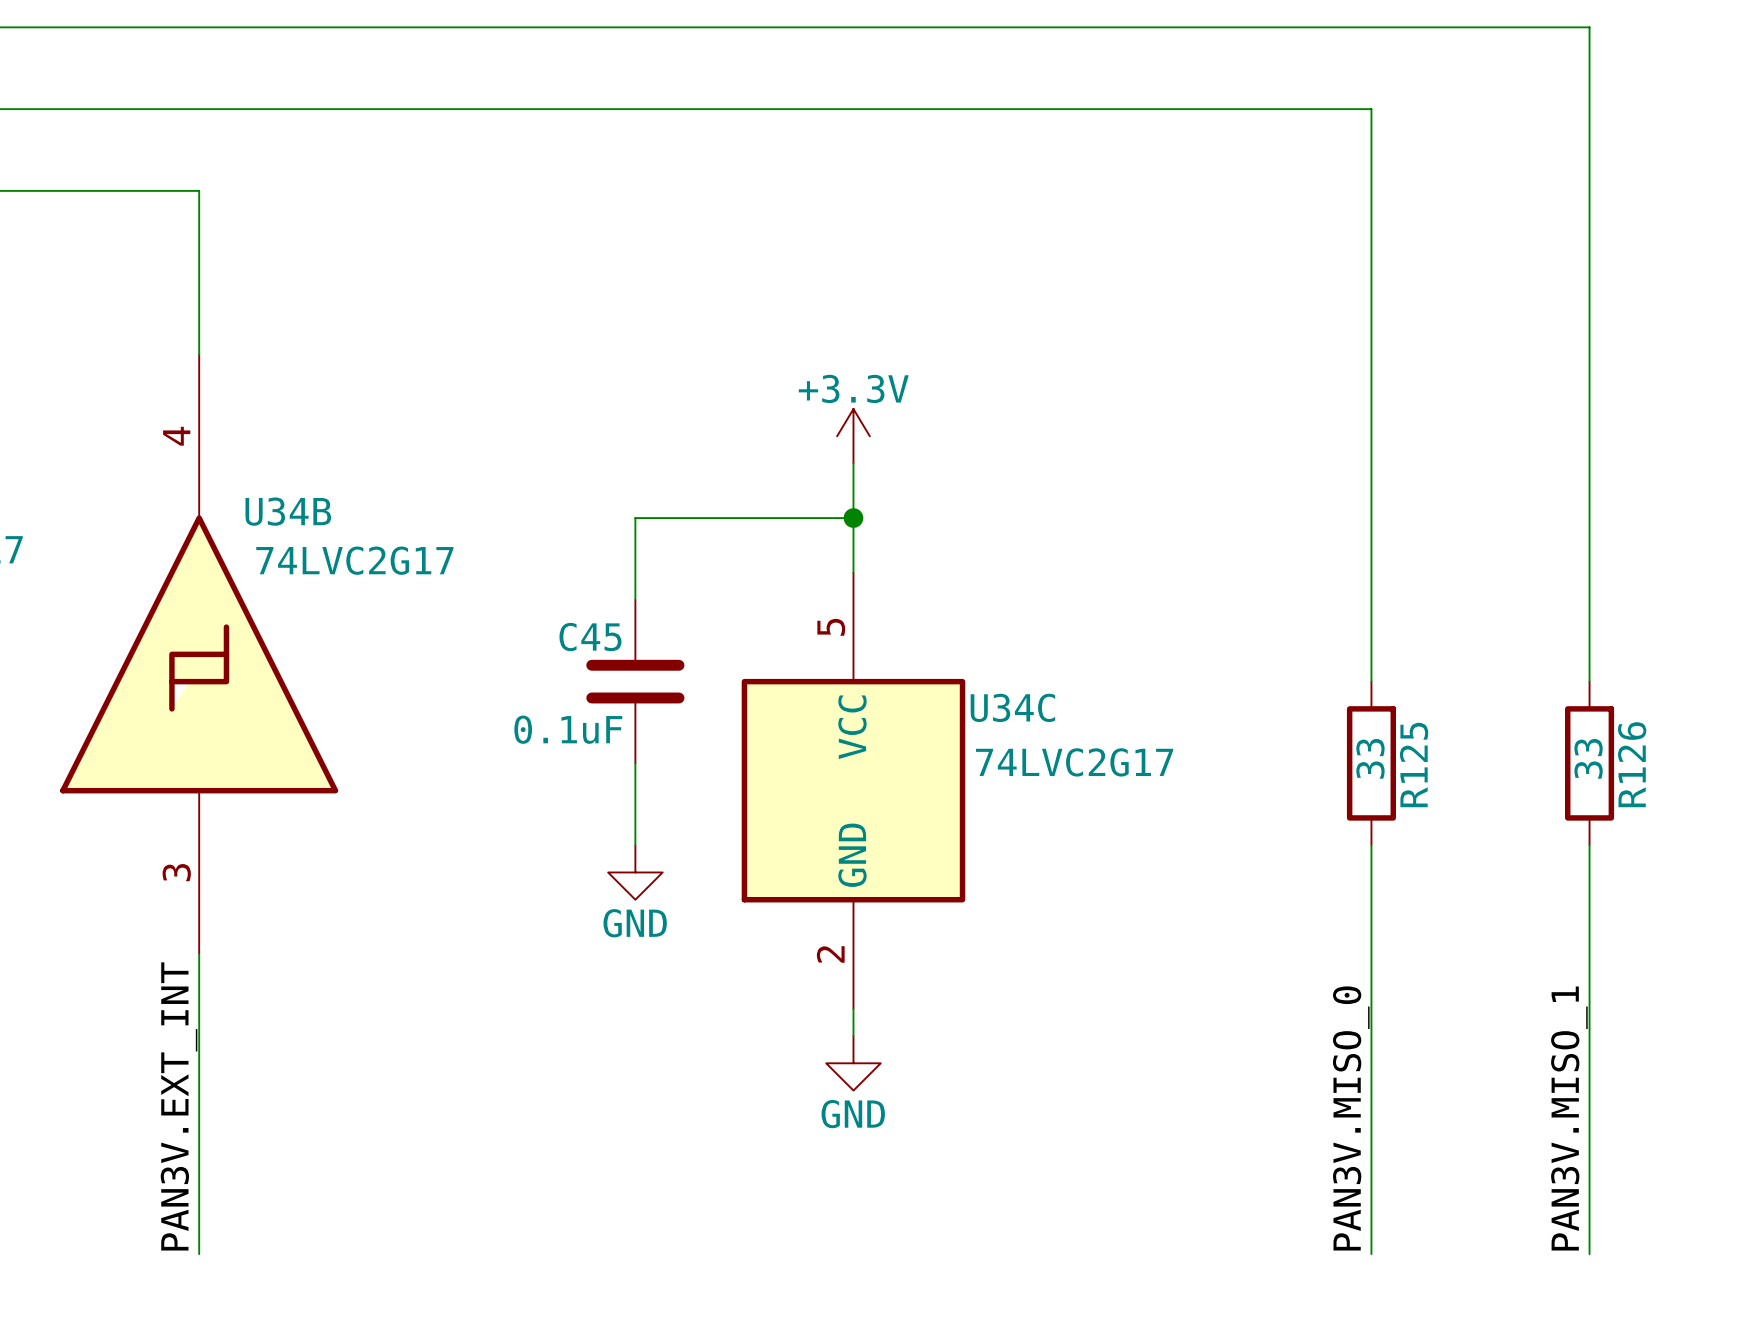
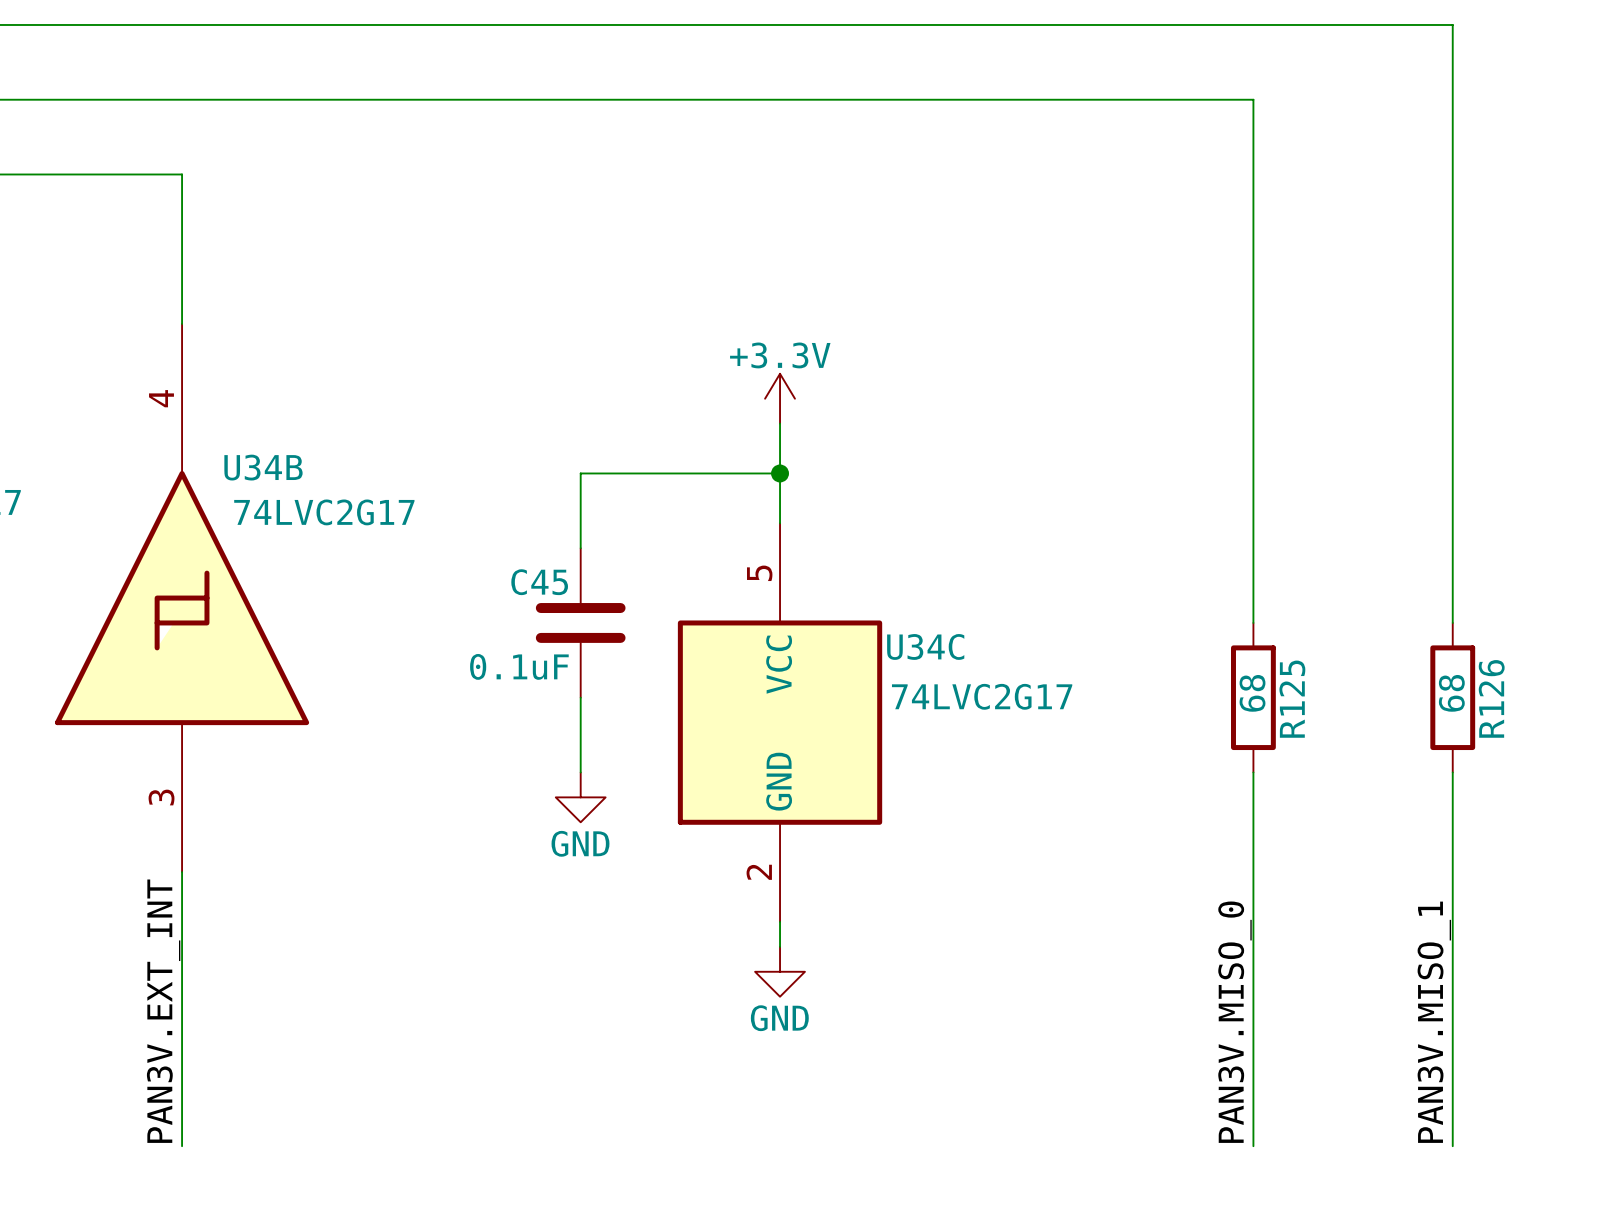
R125 value: 33 (1370, 758) -> 68 (1252, 693)
R126 value: 33 (1588, 758) -> 68 (1451, 693)

